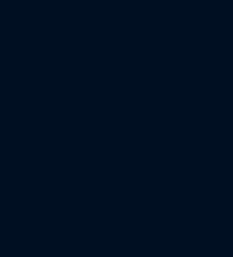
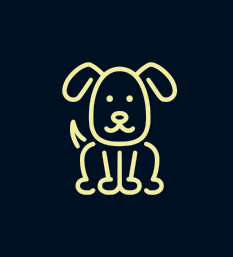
drawing: none -> [62, 62, 178, 195]

